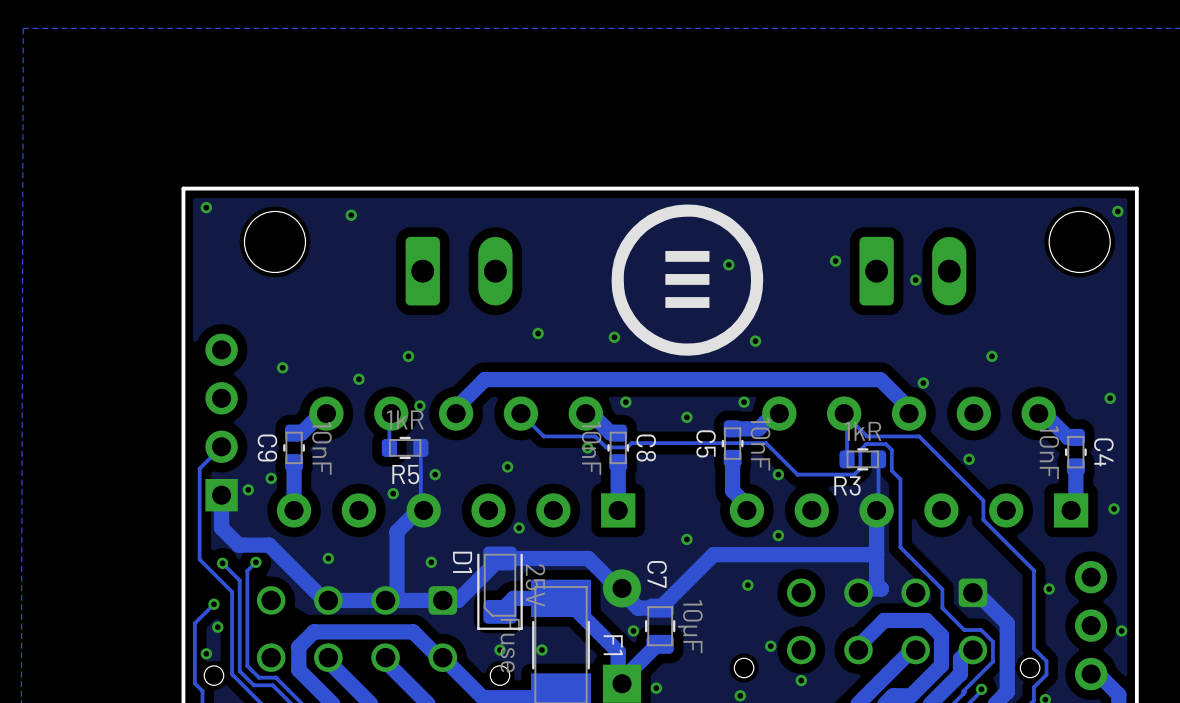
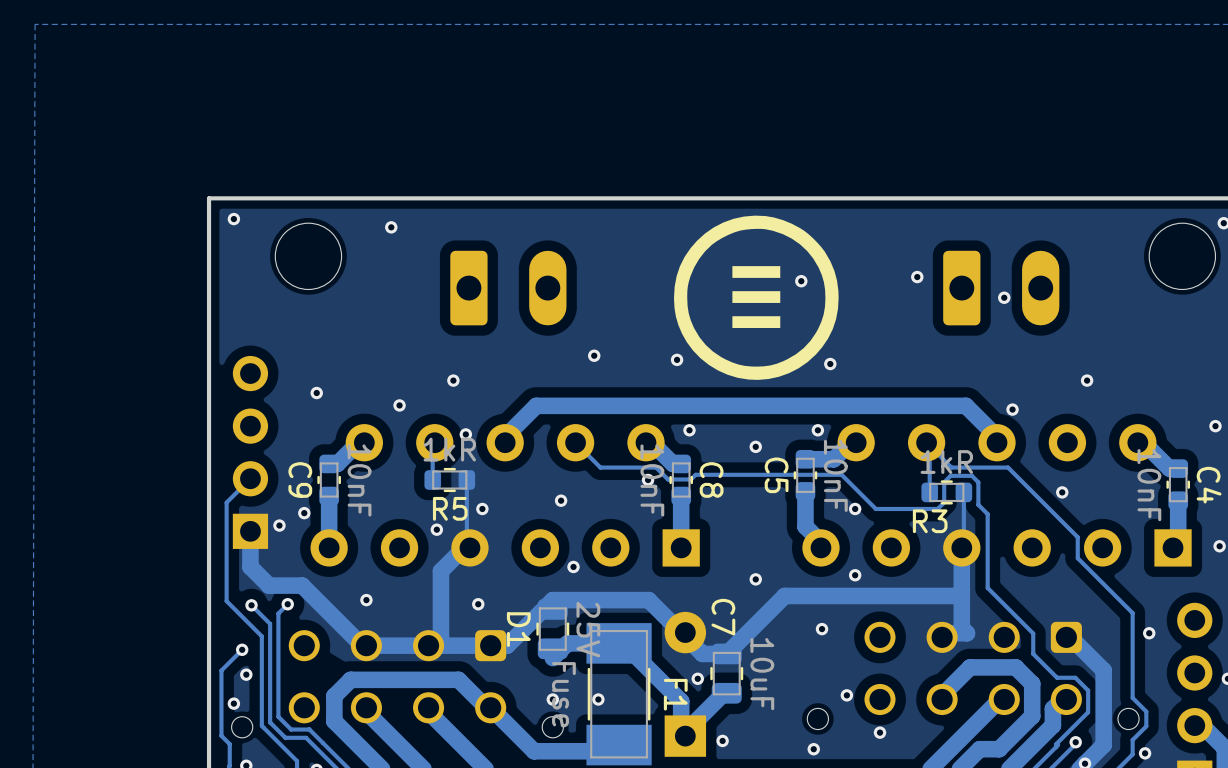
D1 footprint: [477, 546, 523, 630] -> [536, 599, 570, 660]
C7 value: 10µF (690, 626) -> 10uF (762, 674)

